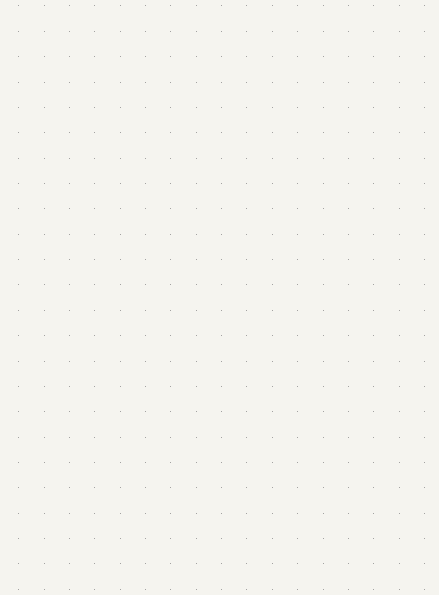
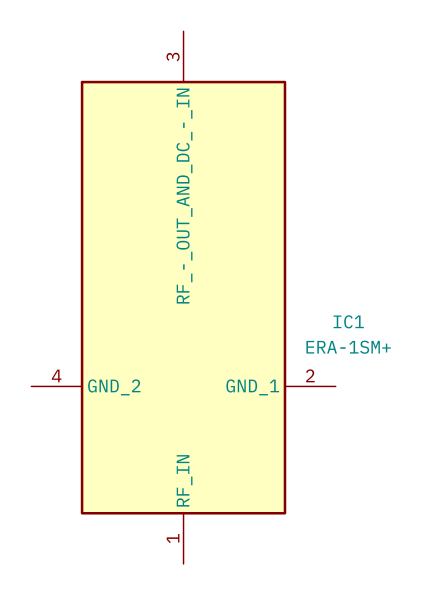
IC1: none -> ERA-1SM+ (183, 297)

